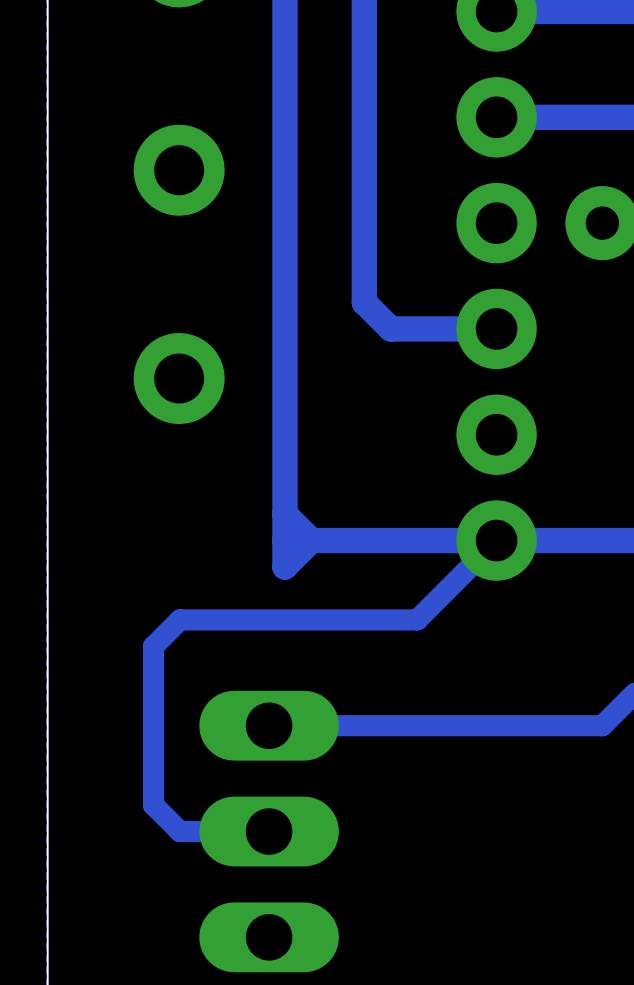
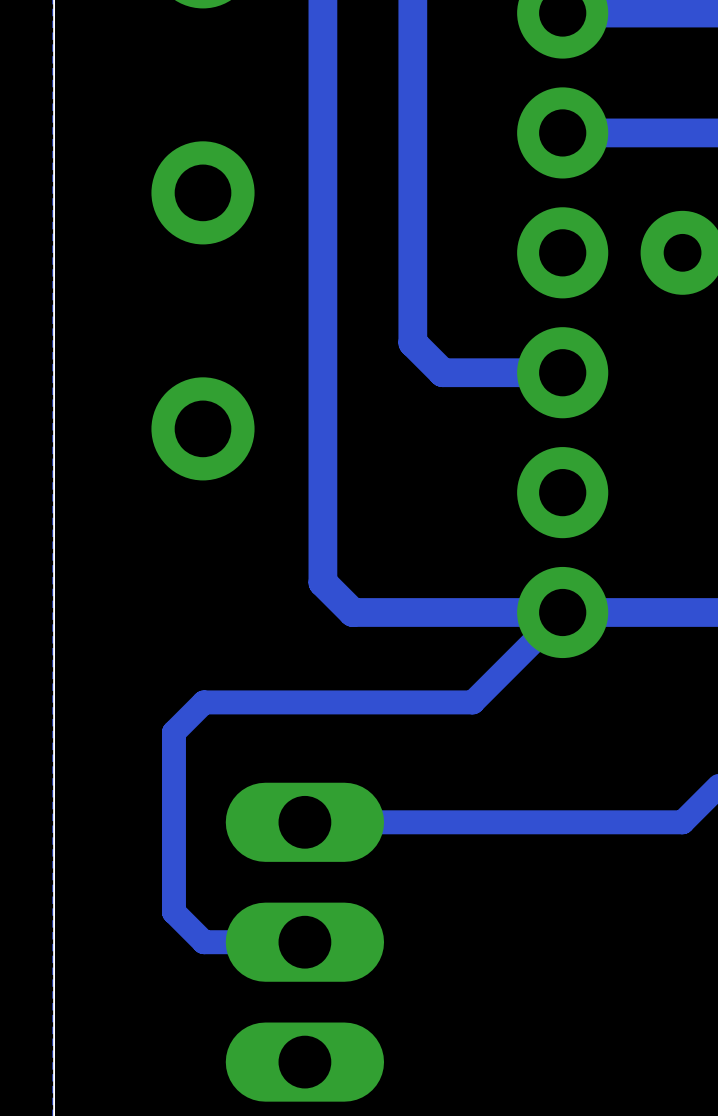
track: (284, 514) (284, 567) (311, 540) (284, 540) -> none

